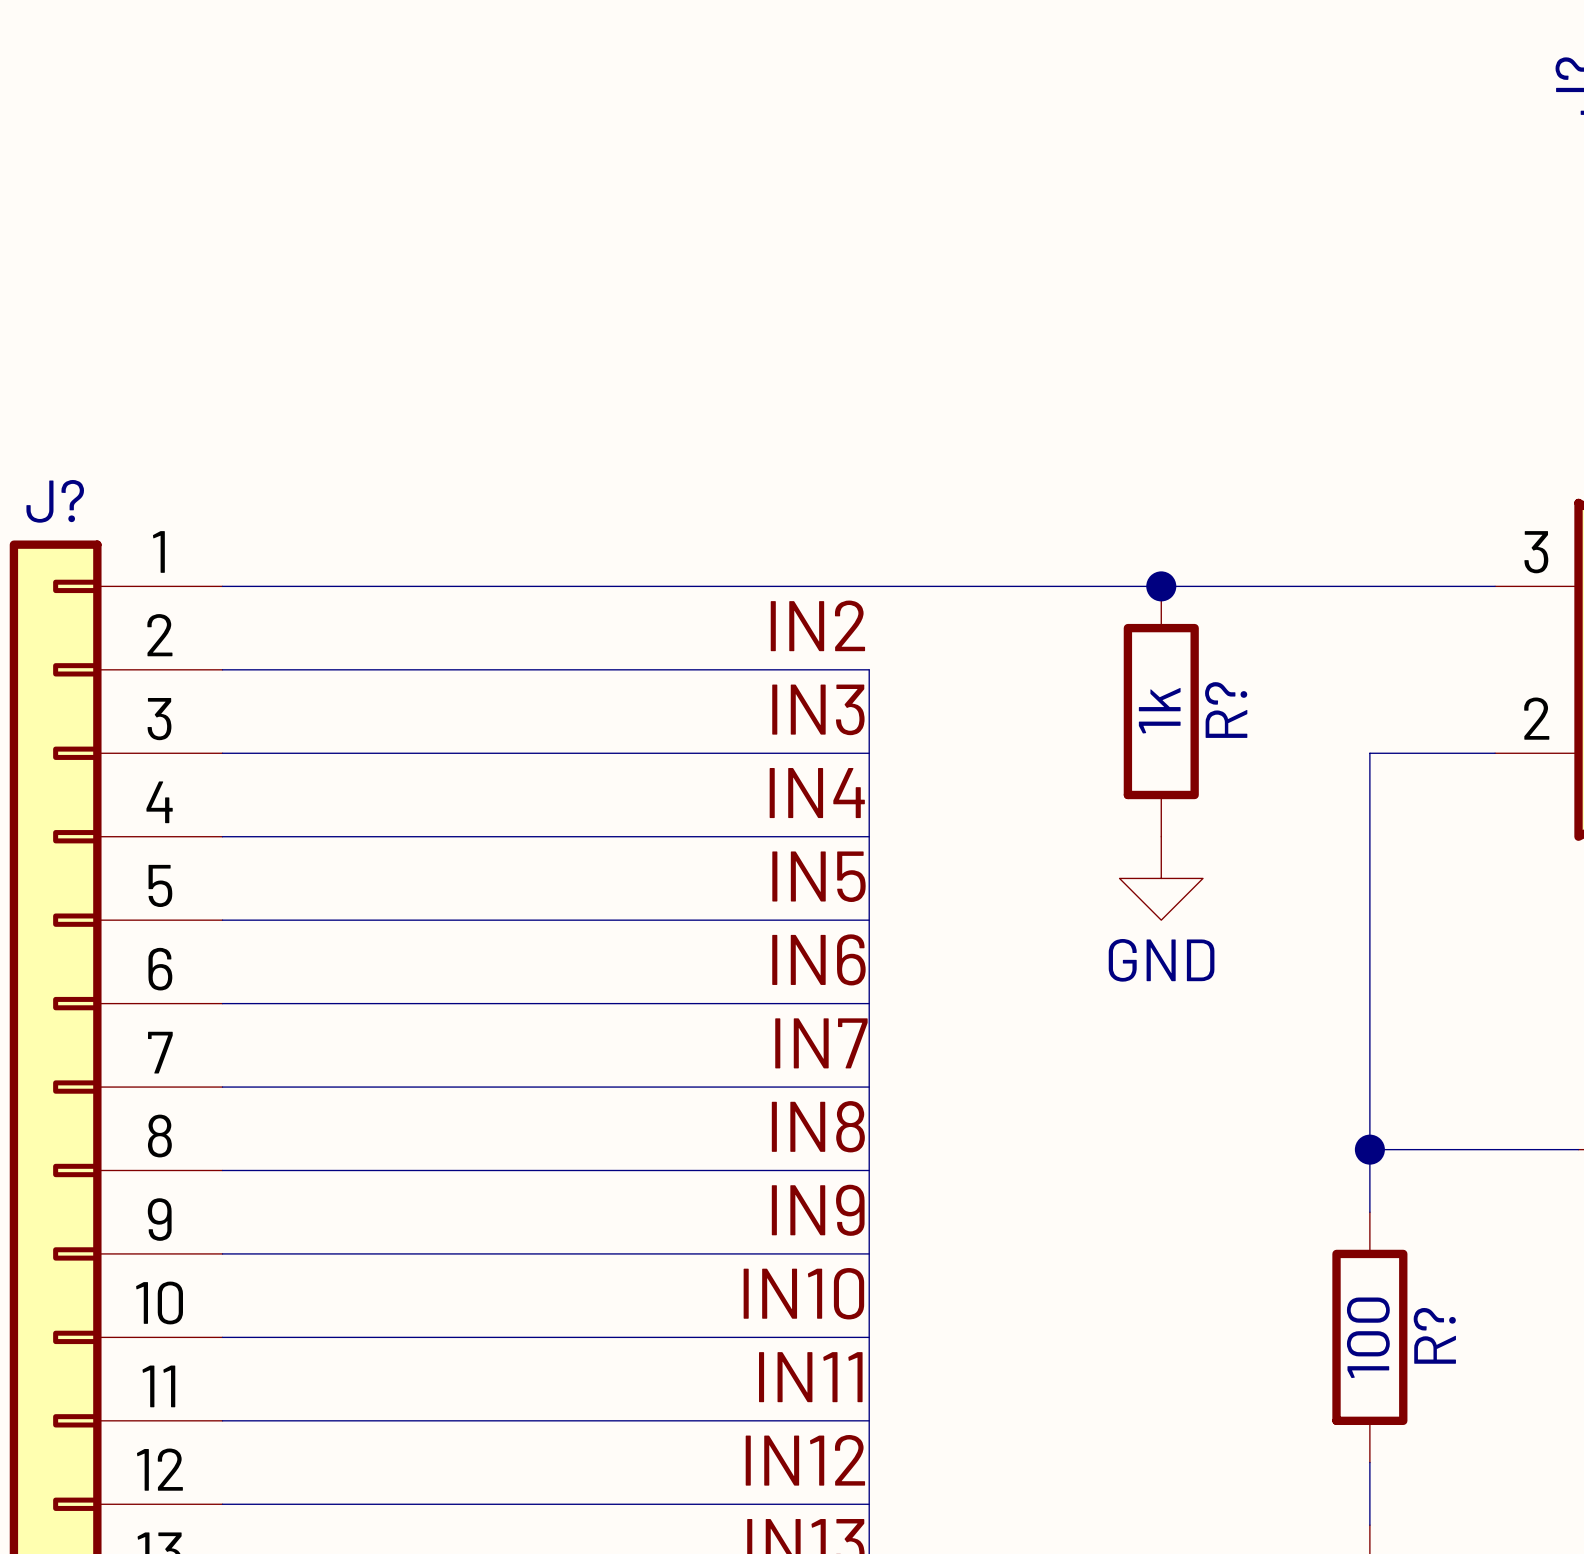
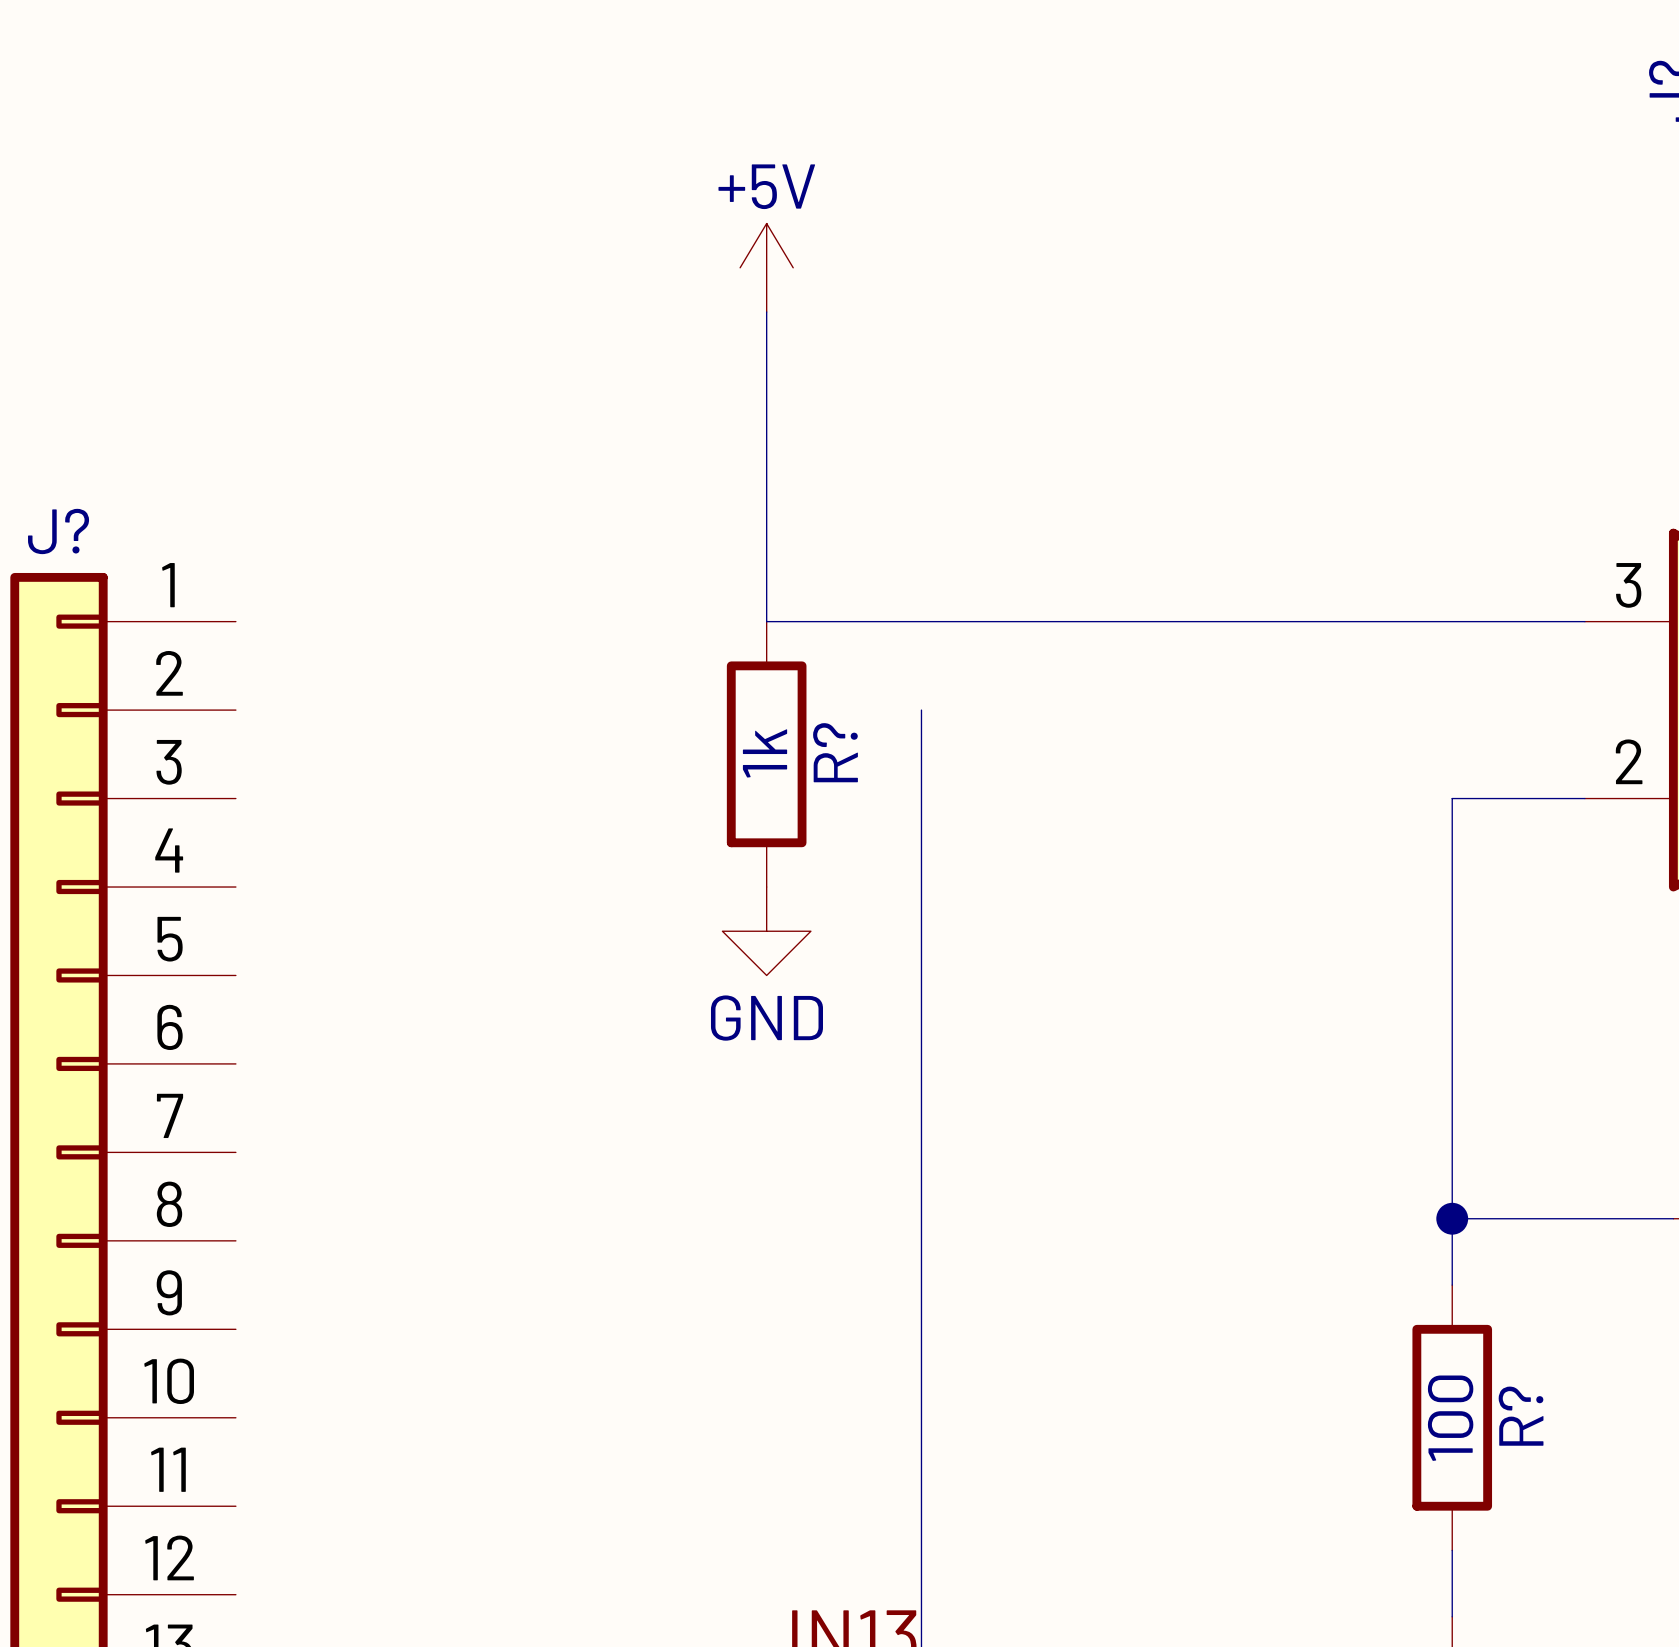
power symbol: none -> +5V (766, 267)
wire: (222, 586) (723, 586) -> (766, 312) (766, 621)
junction: (1161, 586) -> none
label: IN2 (817, 625) -> none
wire: (222, 669) (869, 669) -> none
label: IN3 (818, 709) -> none
R? position: (1161, 711) -> (766, 754)
wire: (222, 753) (869, 753) -> none
label: IN4 (817, 793) -> none
wire: (222, 836) (869, 836) -> none
label: IN5 (818, 876) -> none
power symbol position: GND (1161, 878) -> GND (766, 931)
wire: (222, 920) (869, 920) -> none
label: IN6 (818, 959) -> none
wire: (222, 1003) (869, 1003) -> none
label: IN7 (821, 1043) -> none
wire: (222, 1087) (869, 1087) -> none
label: IN8 (818, 1126) -> none
wire: (222, 1170) (869, 1170) -> none
label: IN9 (818, 1210) -> none
wire: (222, 1253) (869, 1253) -> none
label: IN10 (803, 1293) -> none
wire: (222, 1337) (869, 1337) -> none
label: IN11 (810, 1377) -> none
wire: (222, 1420) (869, 1420) -> none
label: IN12 (805, 1460) -> none
wire: (222, 1504) (869, 1504) -> none

